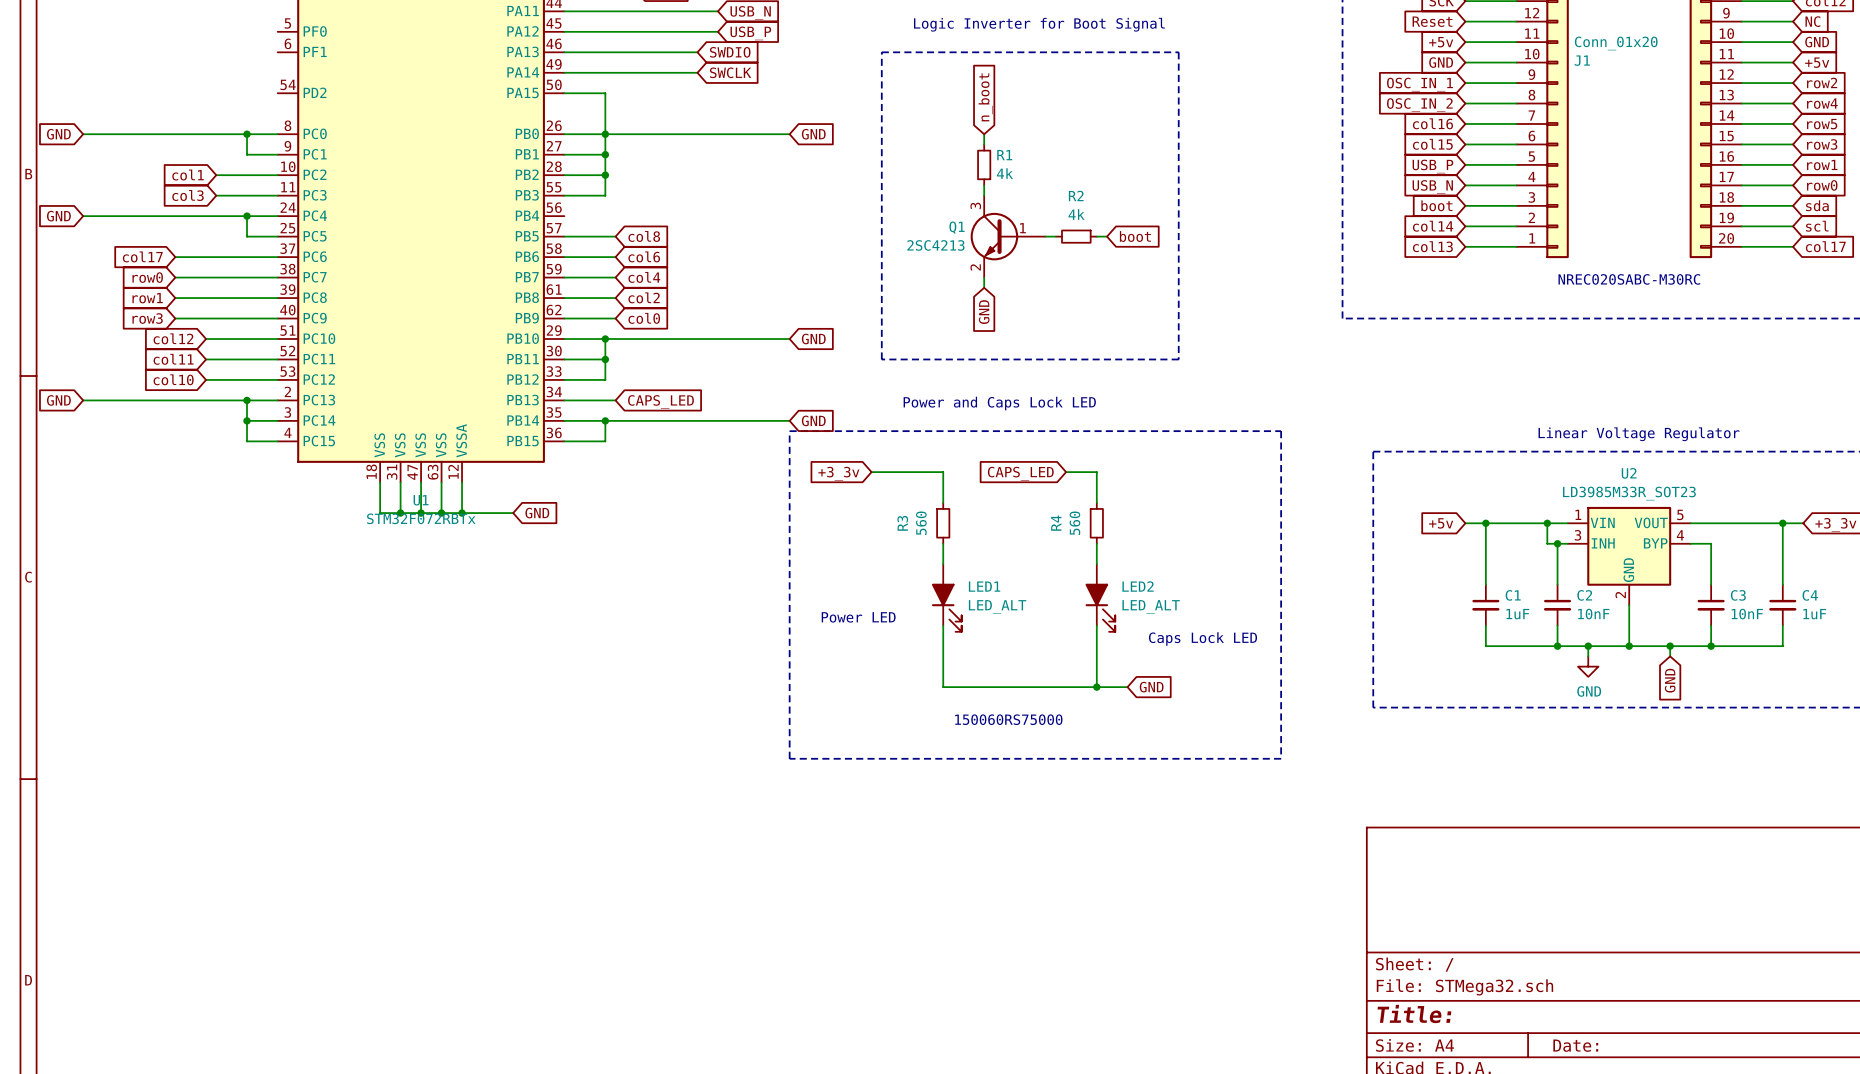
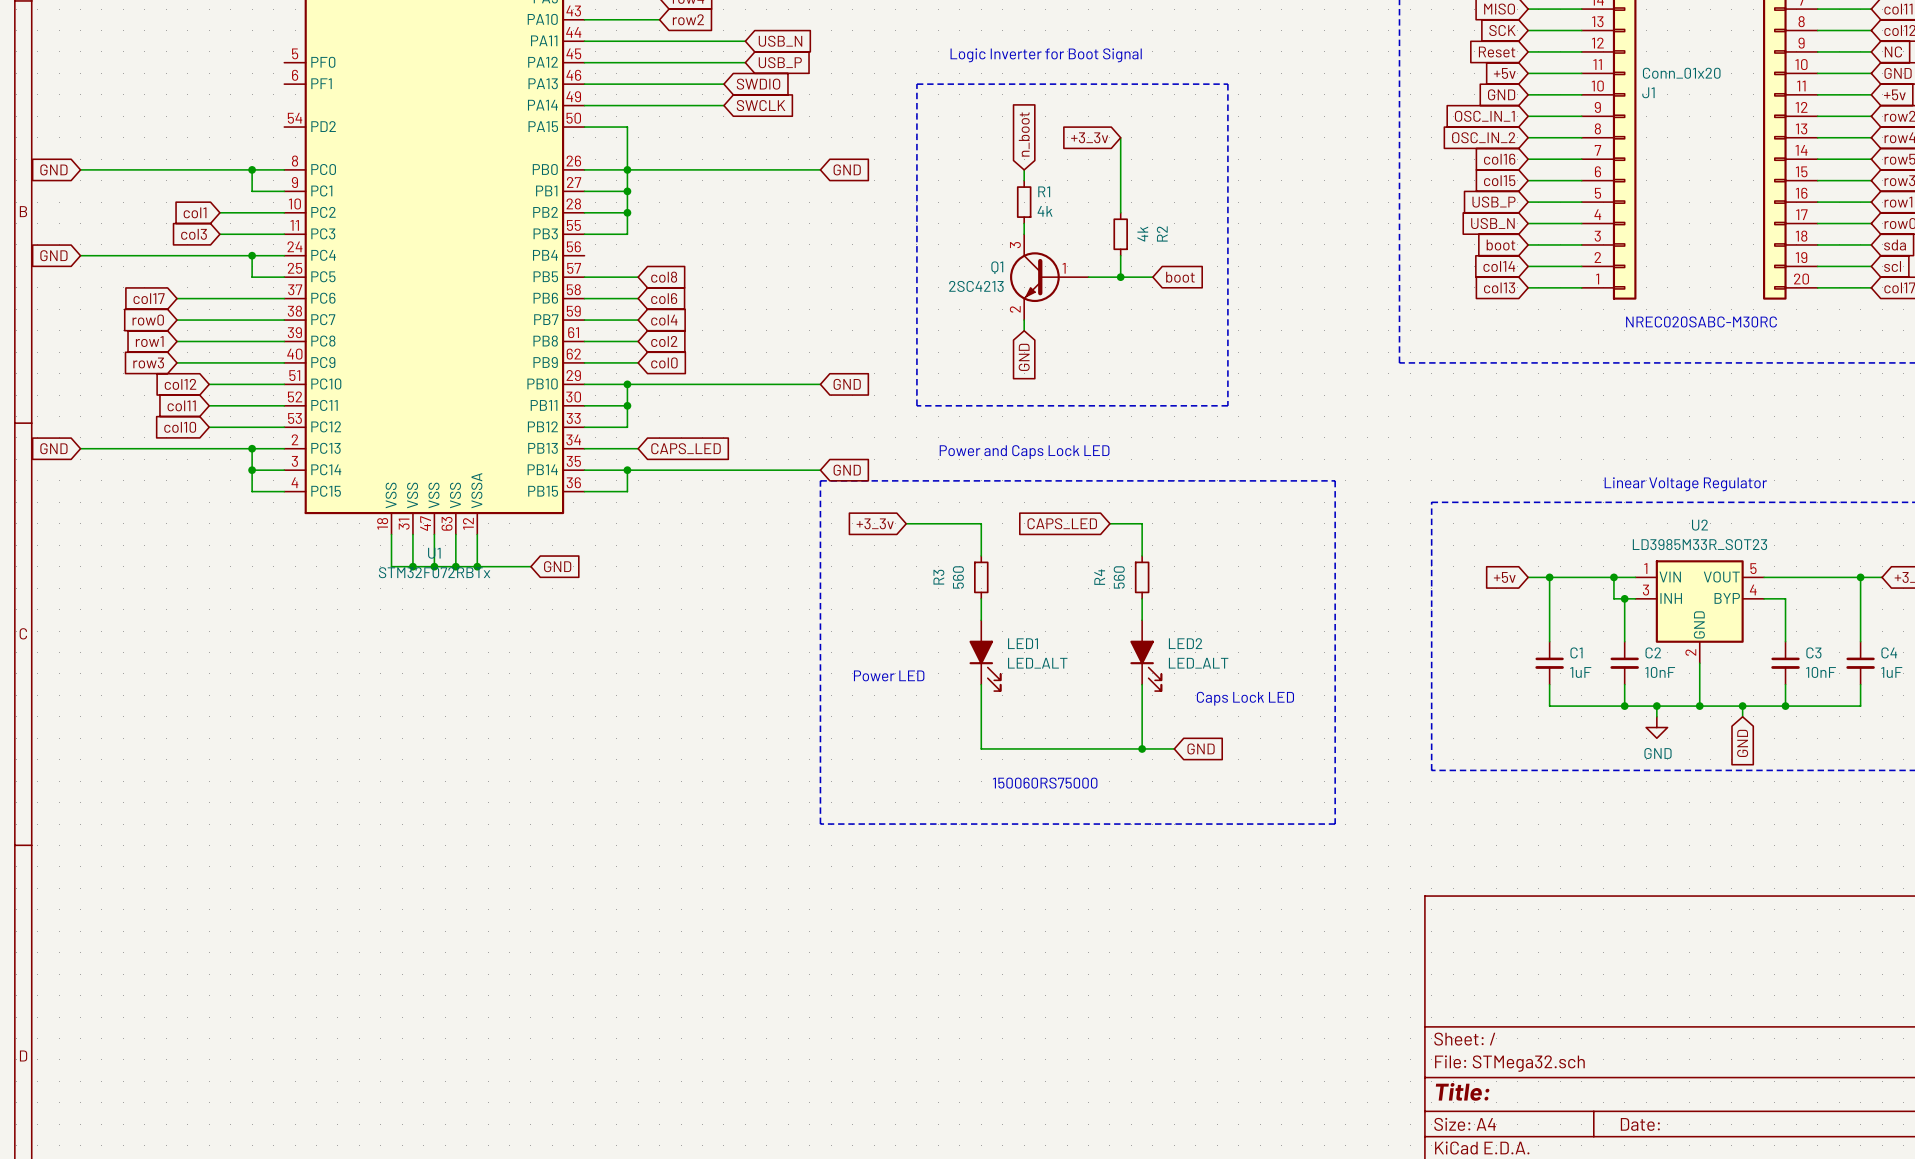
wire: none -> (1120, 137) (1120, 212)
global label: none -> +3_3v (1089, 137)
wire: none -> (1120, 255) (1120, 277)
wire: none -> (1099, 277) (1142, 277)
R2 rotation: 0° (1076, 236) -> 90° clockwise (1120, 234)
R2 position: (1076, 236) -> (1120, 234)
junction: none -> (1120, 277)

